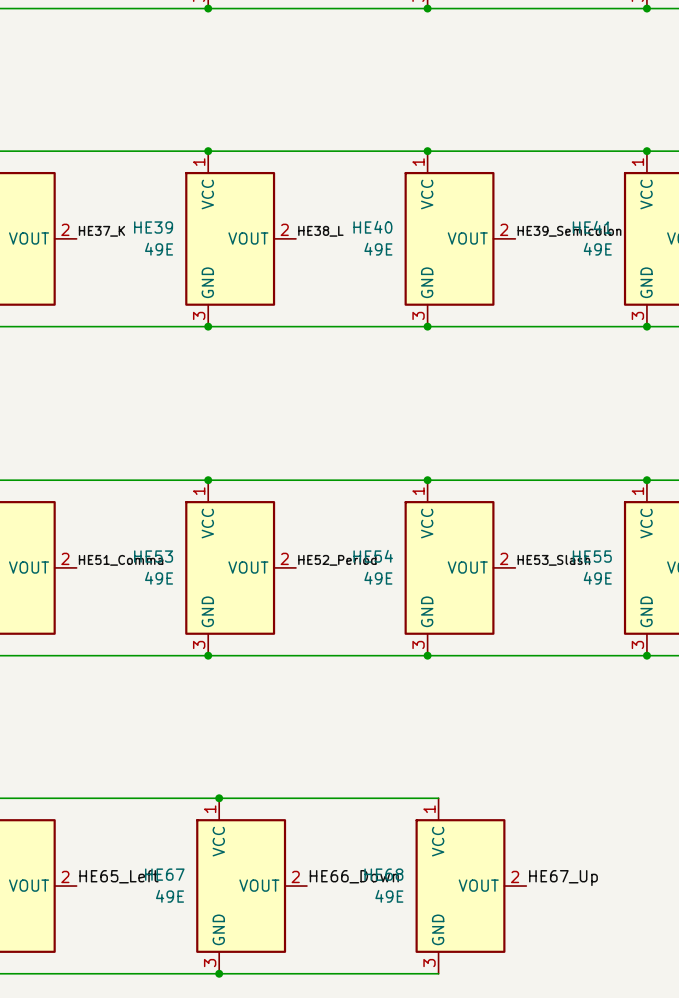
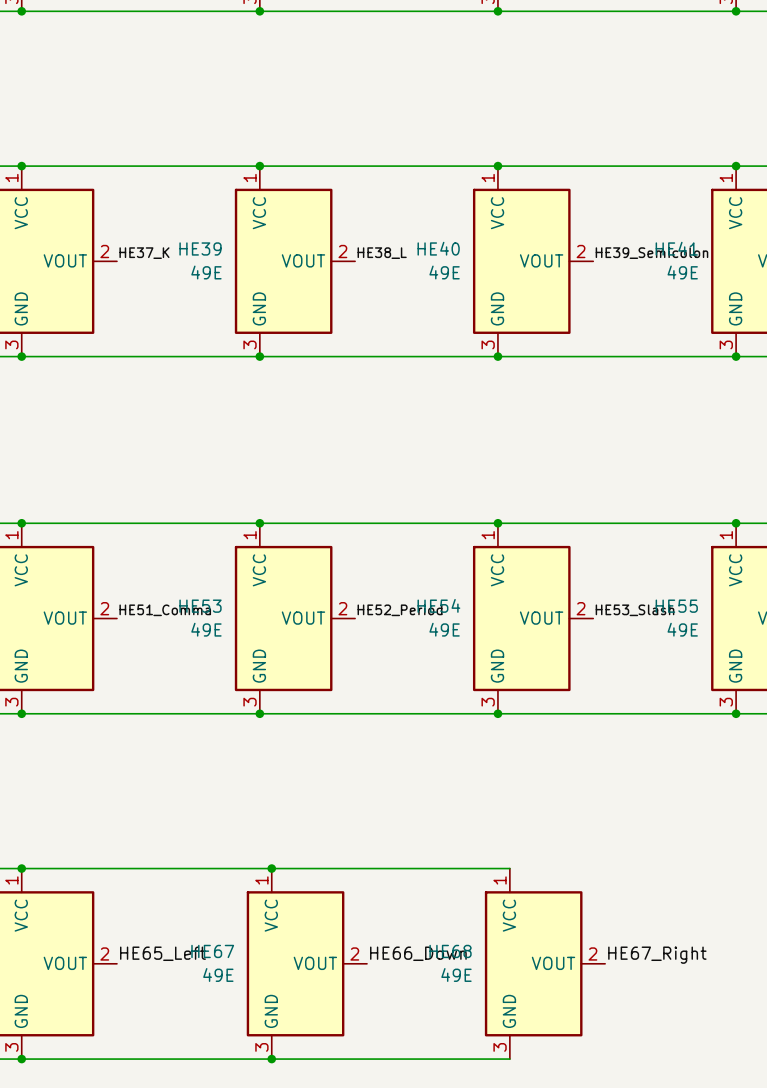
label: HE67_Up (563, 878) -> HE67_Right (657, 955)

